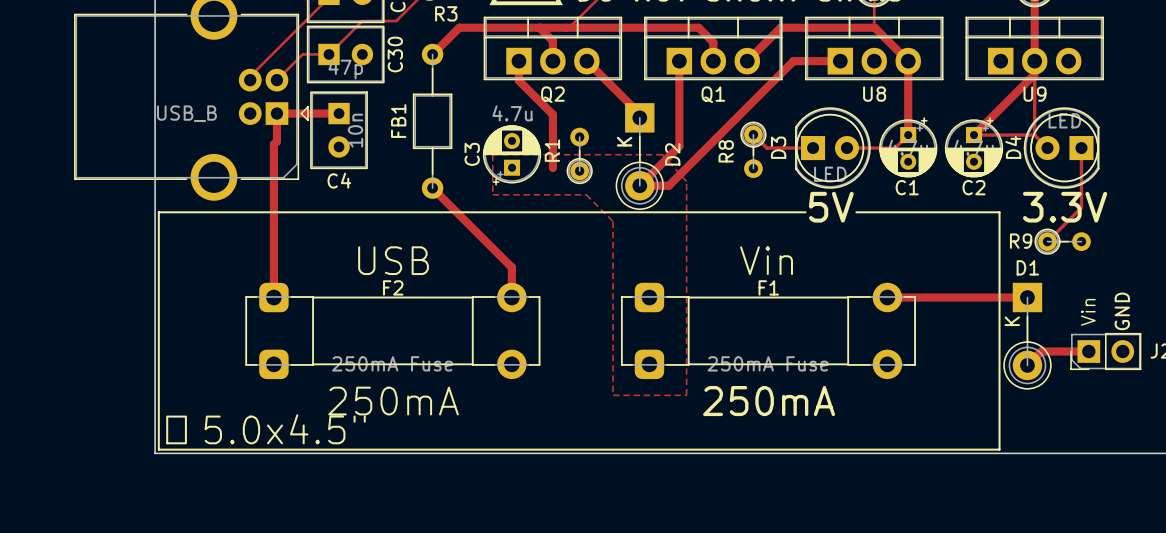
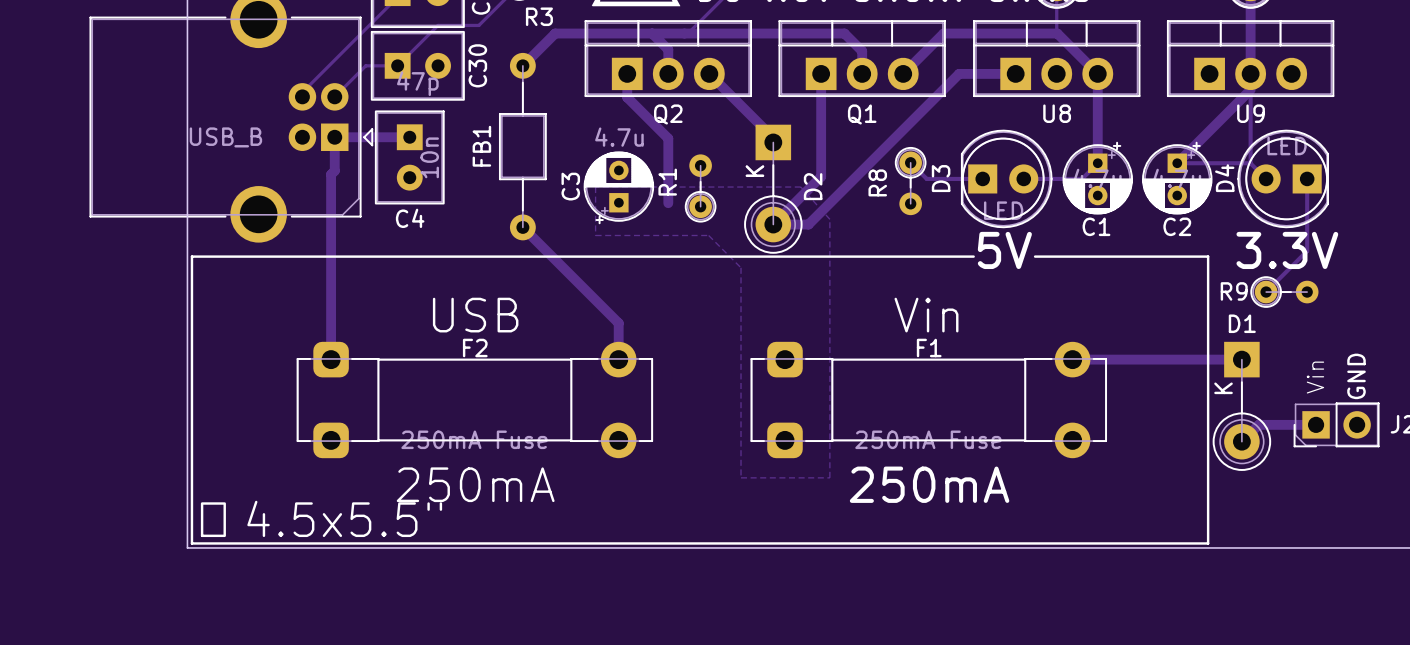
text: 5.0x4.5" (285, 429) -> 4.5x5.5" (344, 518)

